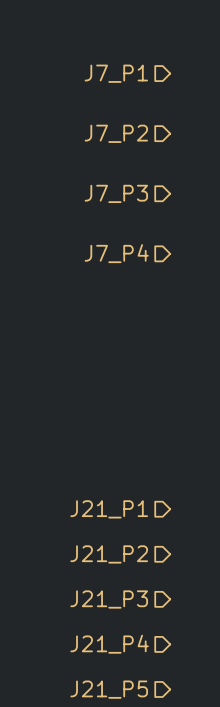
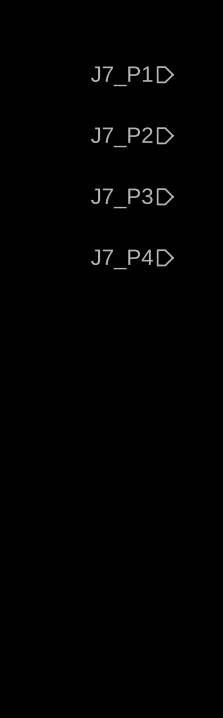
hierarchical label: J21_P1 (109, 509) -> none
hierarchical label: J21_P2 (109, 554) -> none
hierarchical label: J21_P3 (109, 599) -> none
hierarchical label: J21_P4 (109, 644) -> none
hierarchical label: J21_P5 (109, 689) -> none

